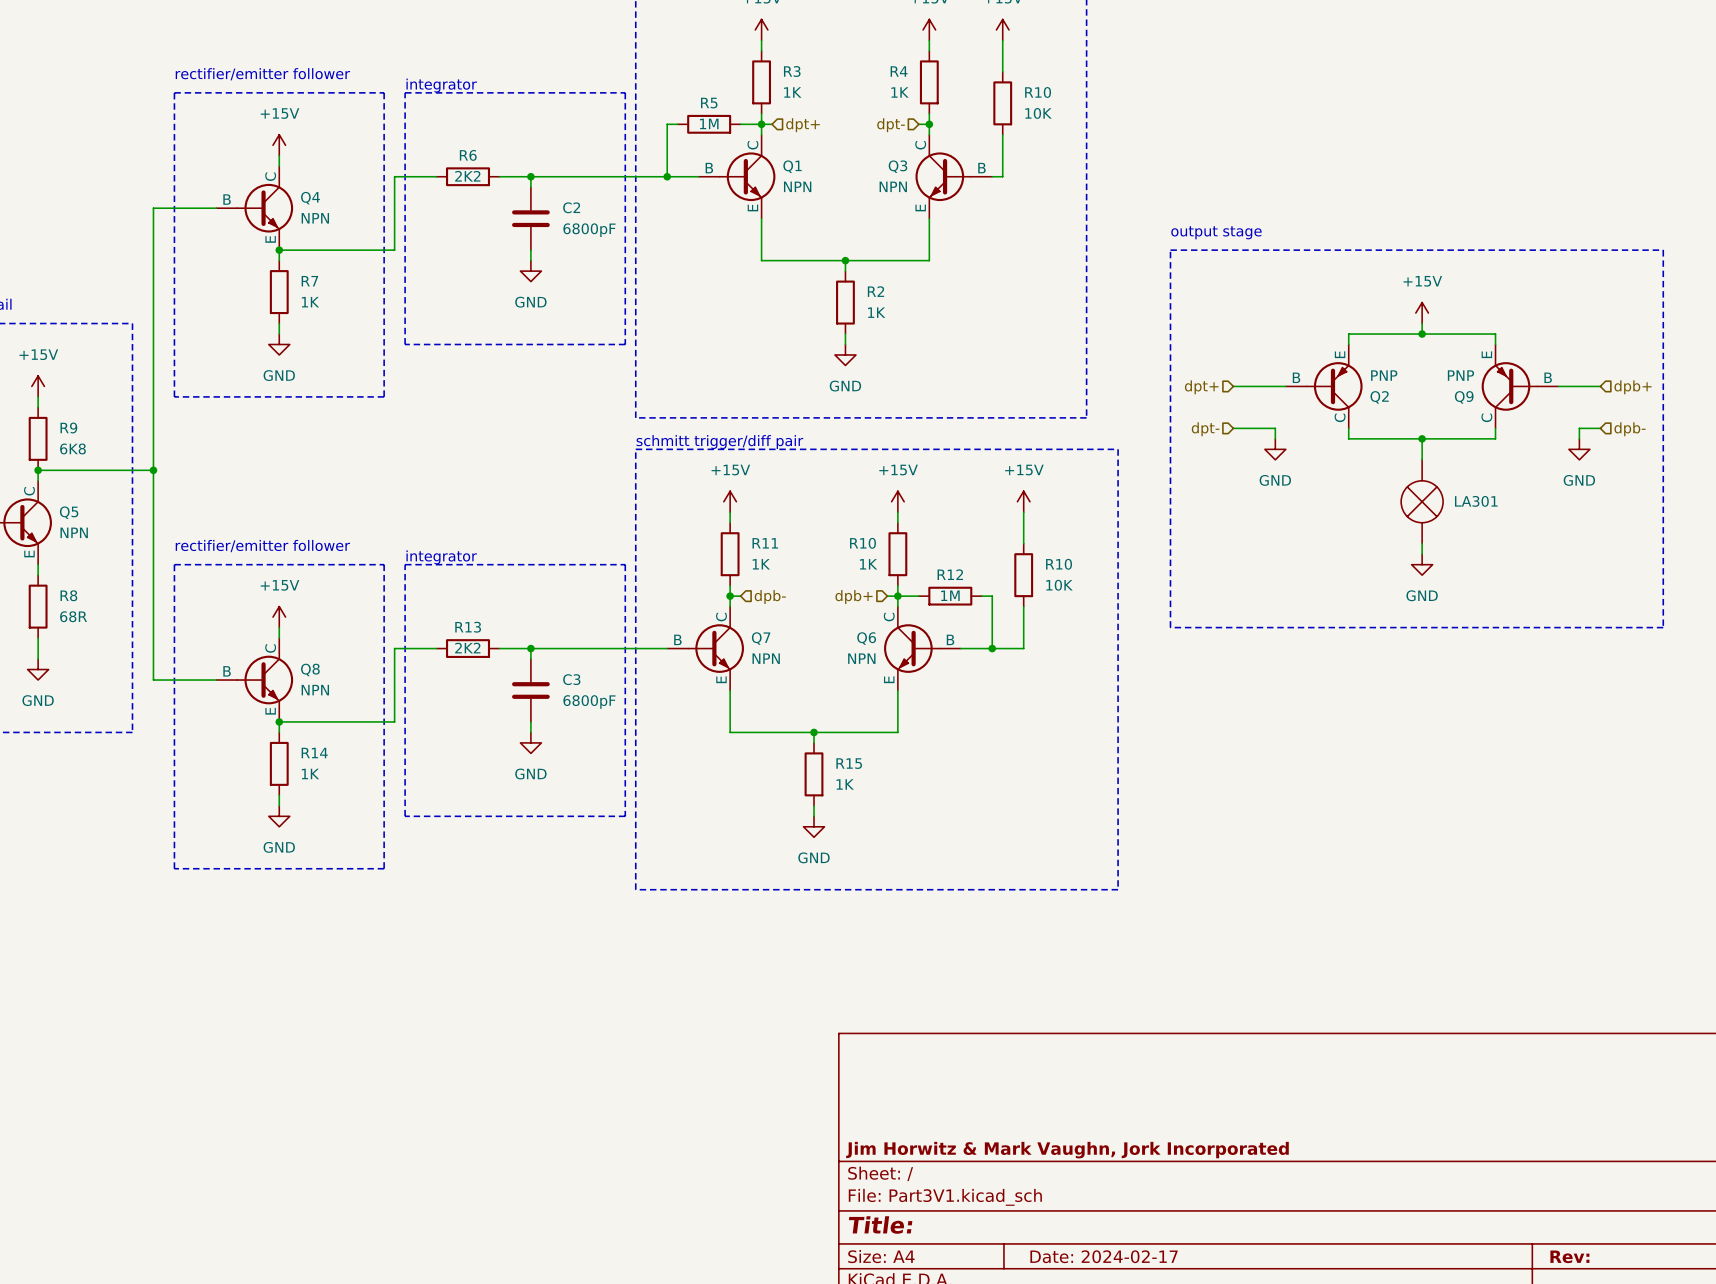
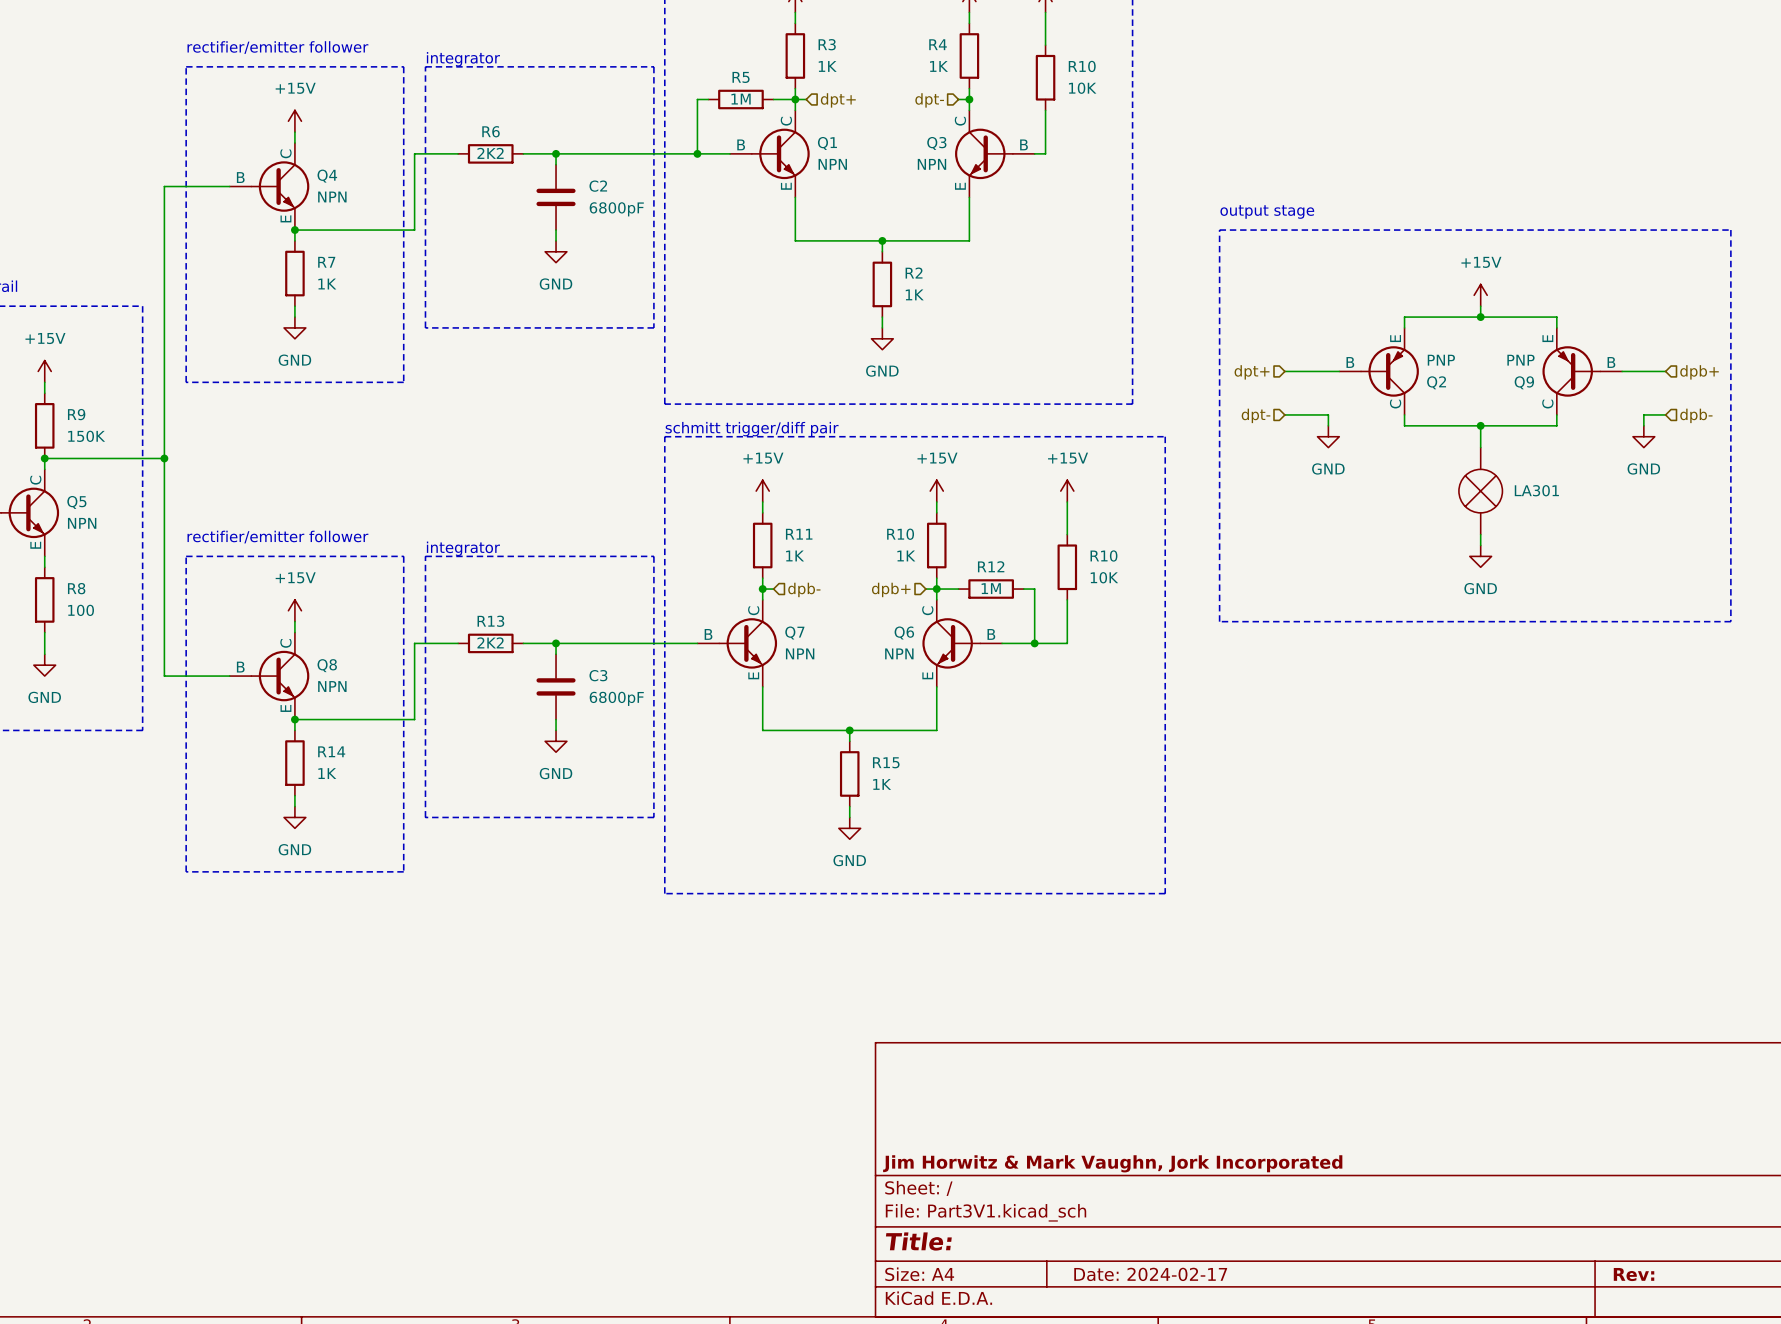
R9 value: 6K8 (72, 448) -> 150K (86, 436)
R8 value: 68R (73, 616) -> 100 (81, 610)

